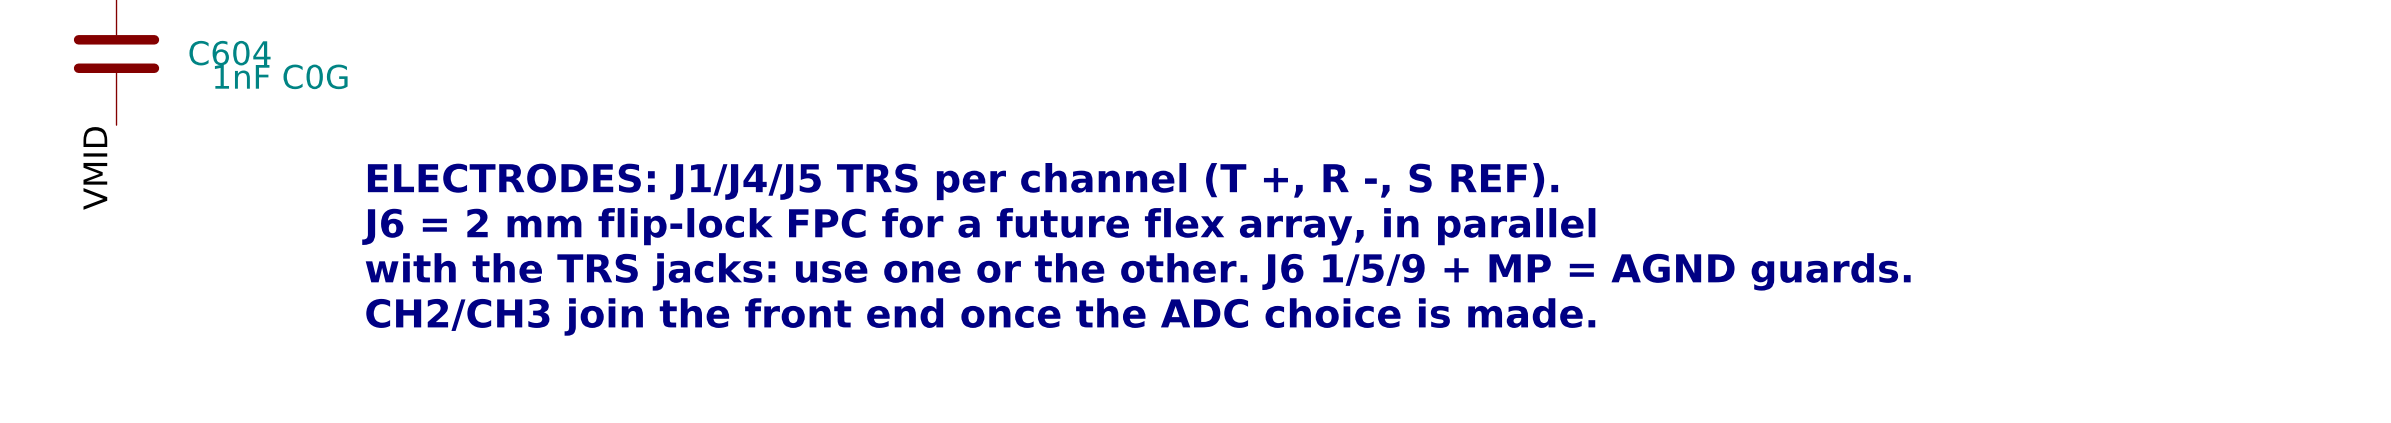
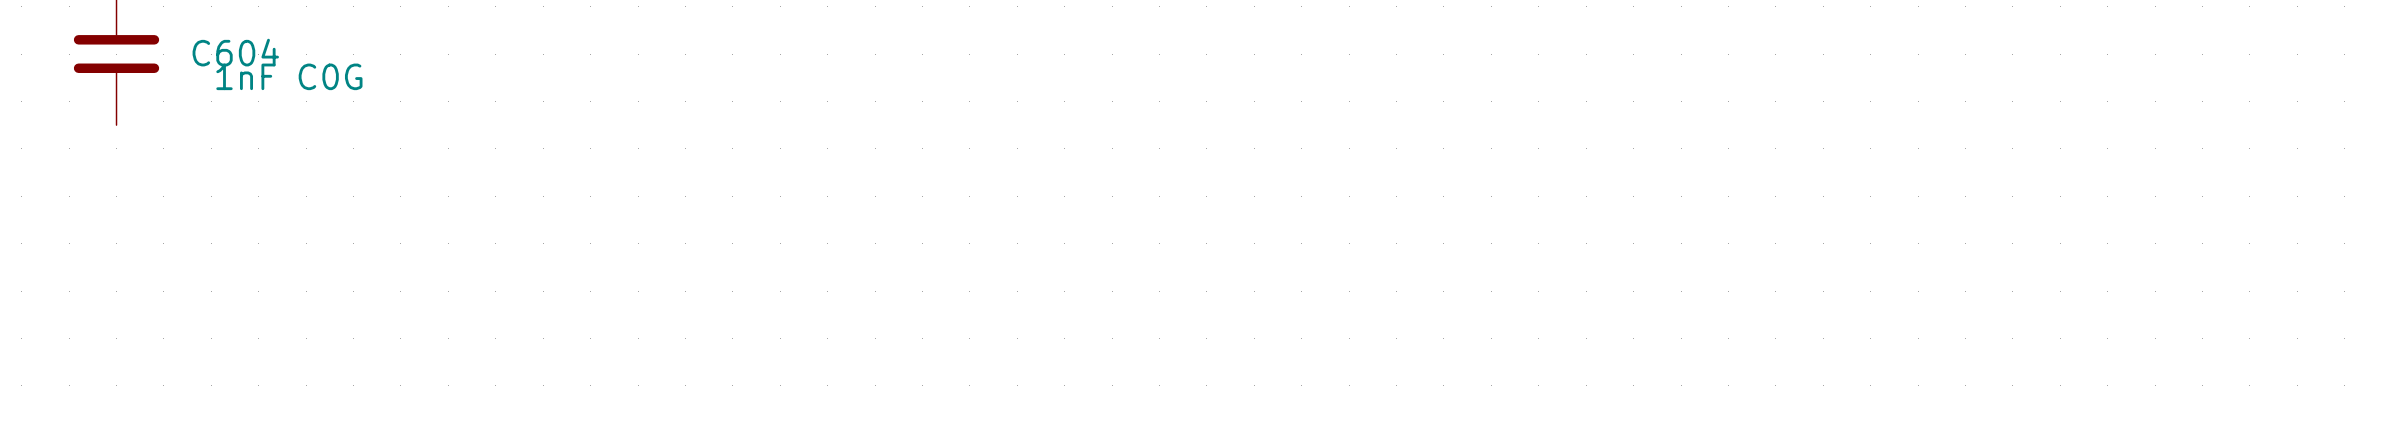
label: VMID (95, 168) -> none
text: ELECTRODES: J1/J4/J5 TRS per channel (T +, R -, S REF). (963, 181) -> none
text: J6 = 2 mm flip-lock FPC for a future flex array, in parallel (978, 226) -> none
text: with the TRS jacks: use one or the other. J6 1/5/9 + MP = AGND guards. (1138, 271) -> none
text: CH2/CH3 join the front end once the ADC choice is made. (980, 316) -> none

